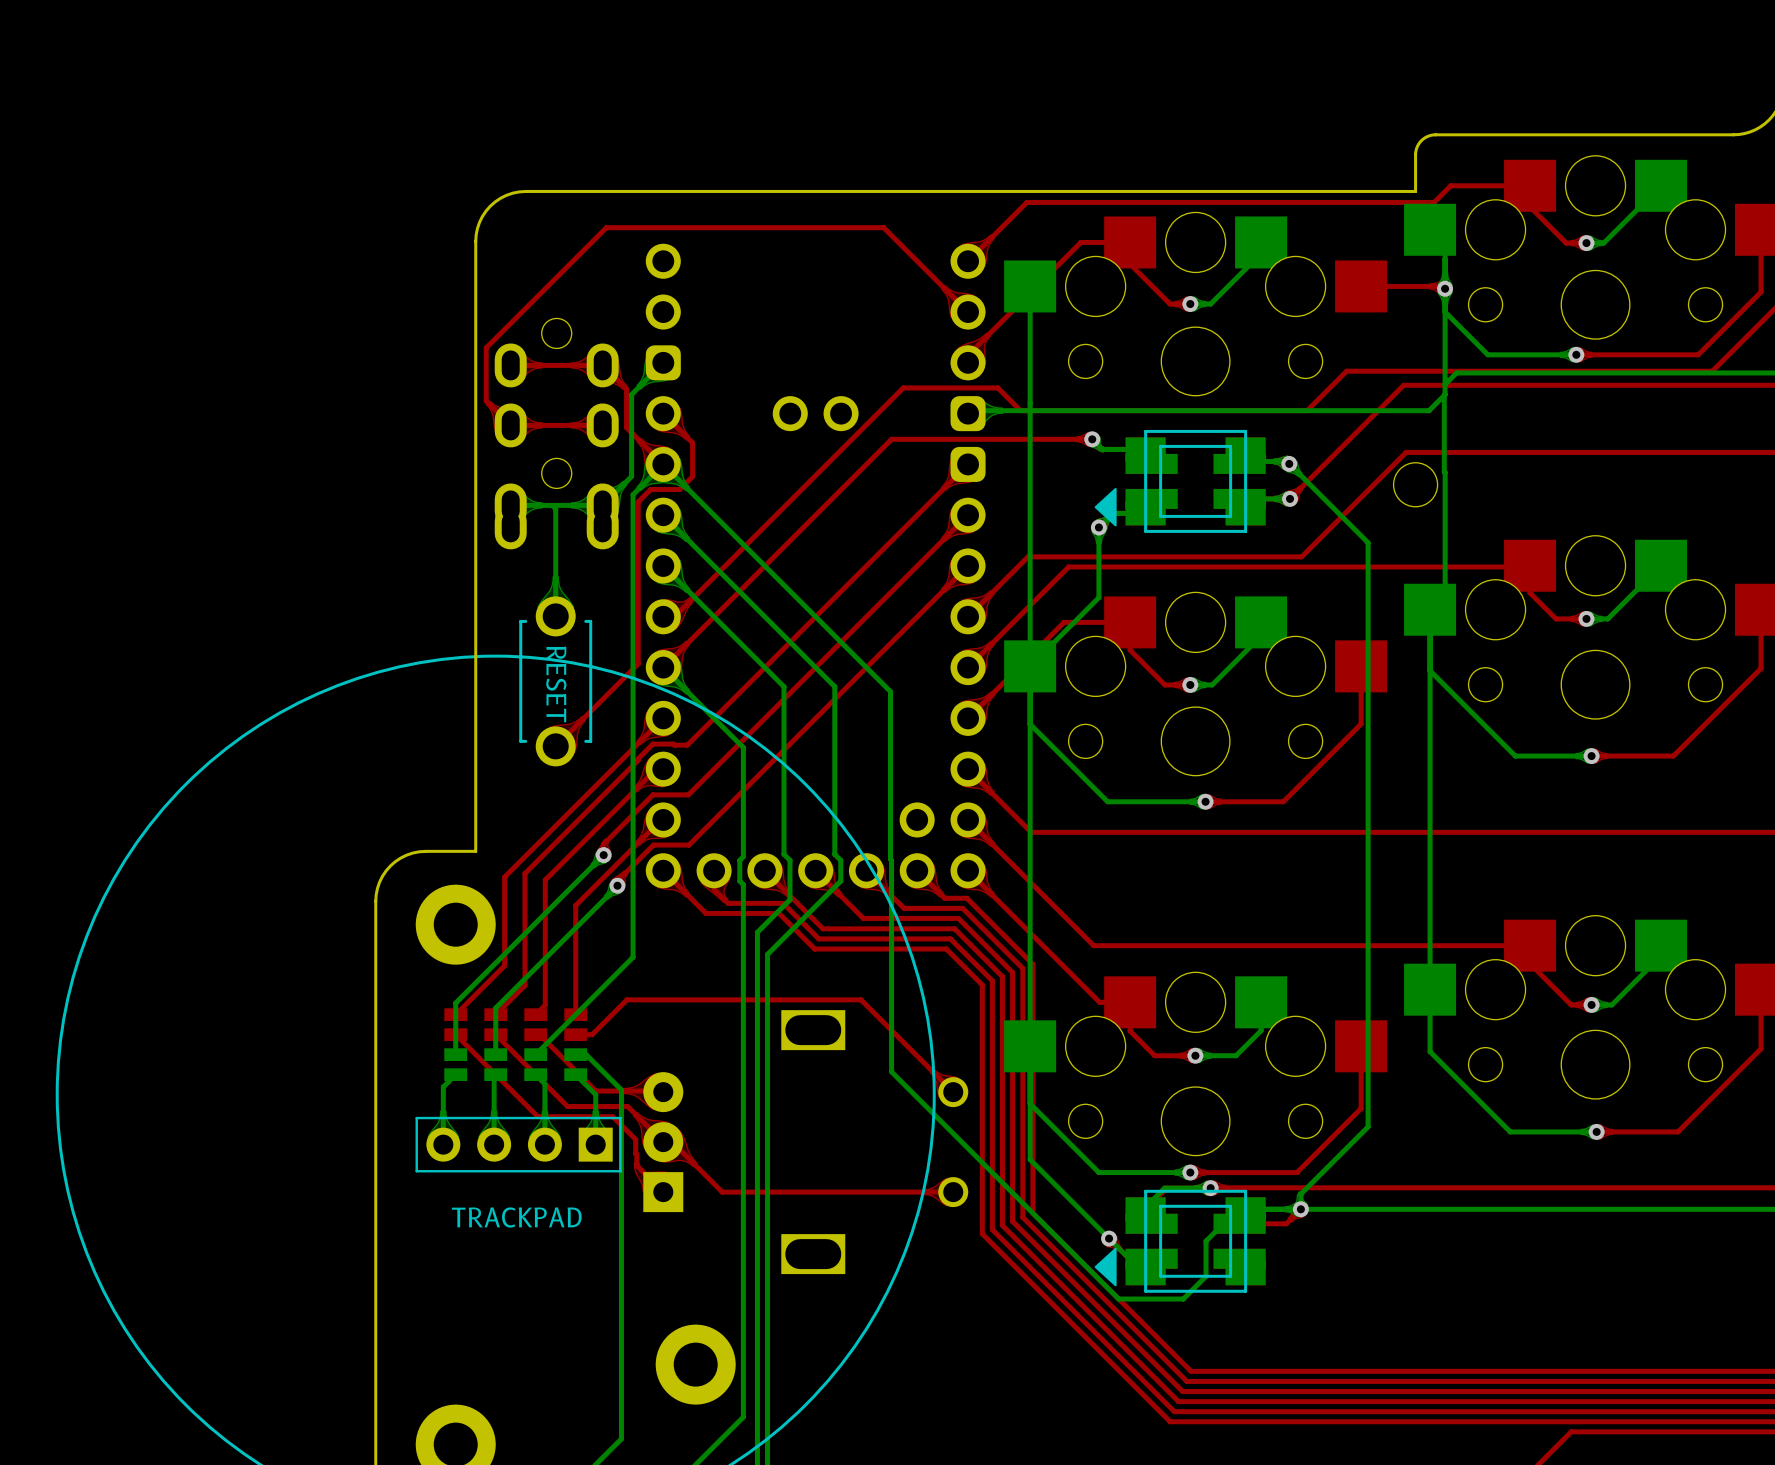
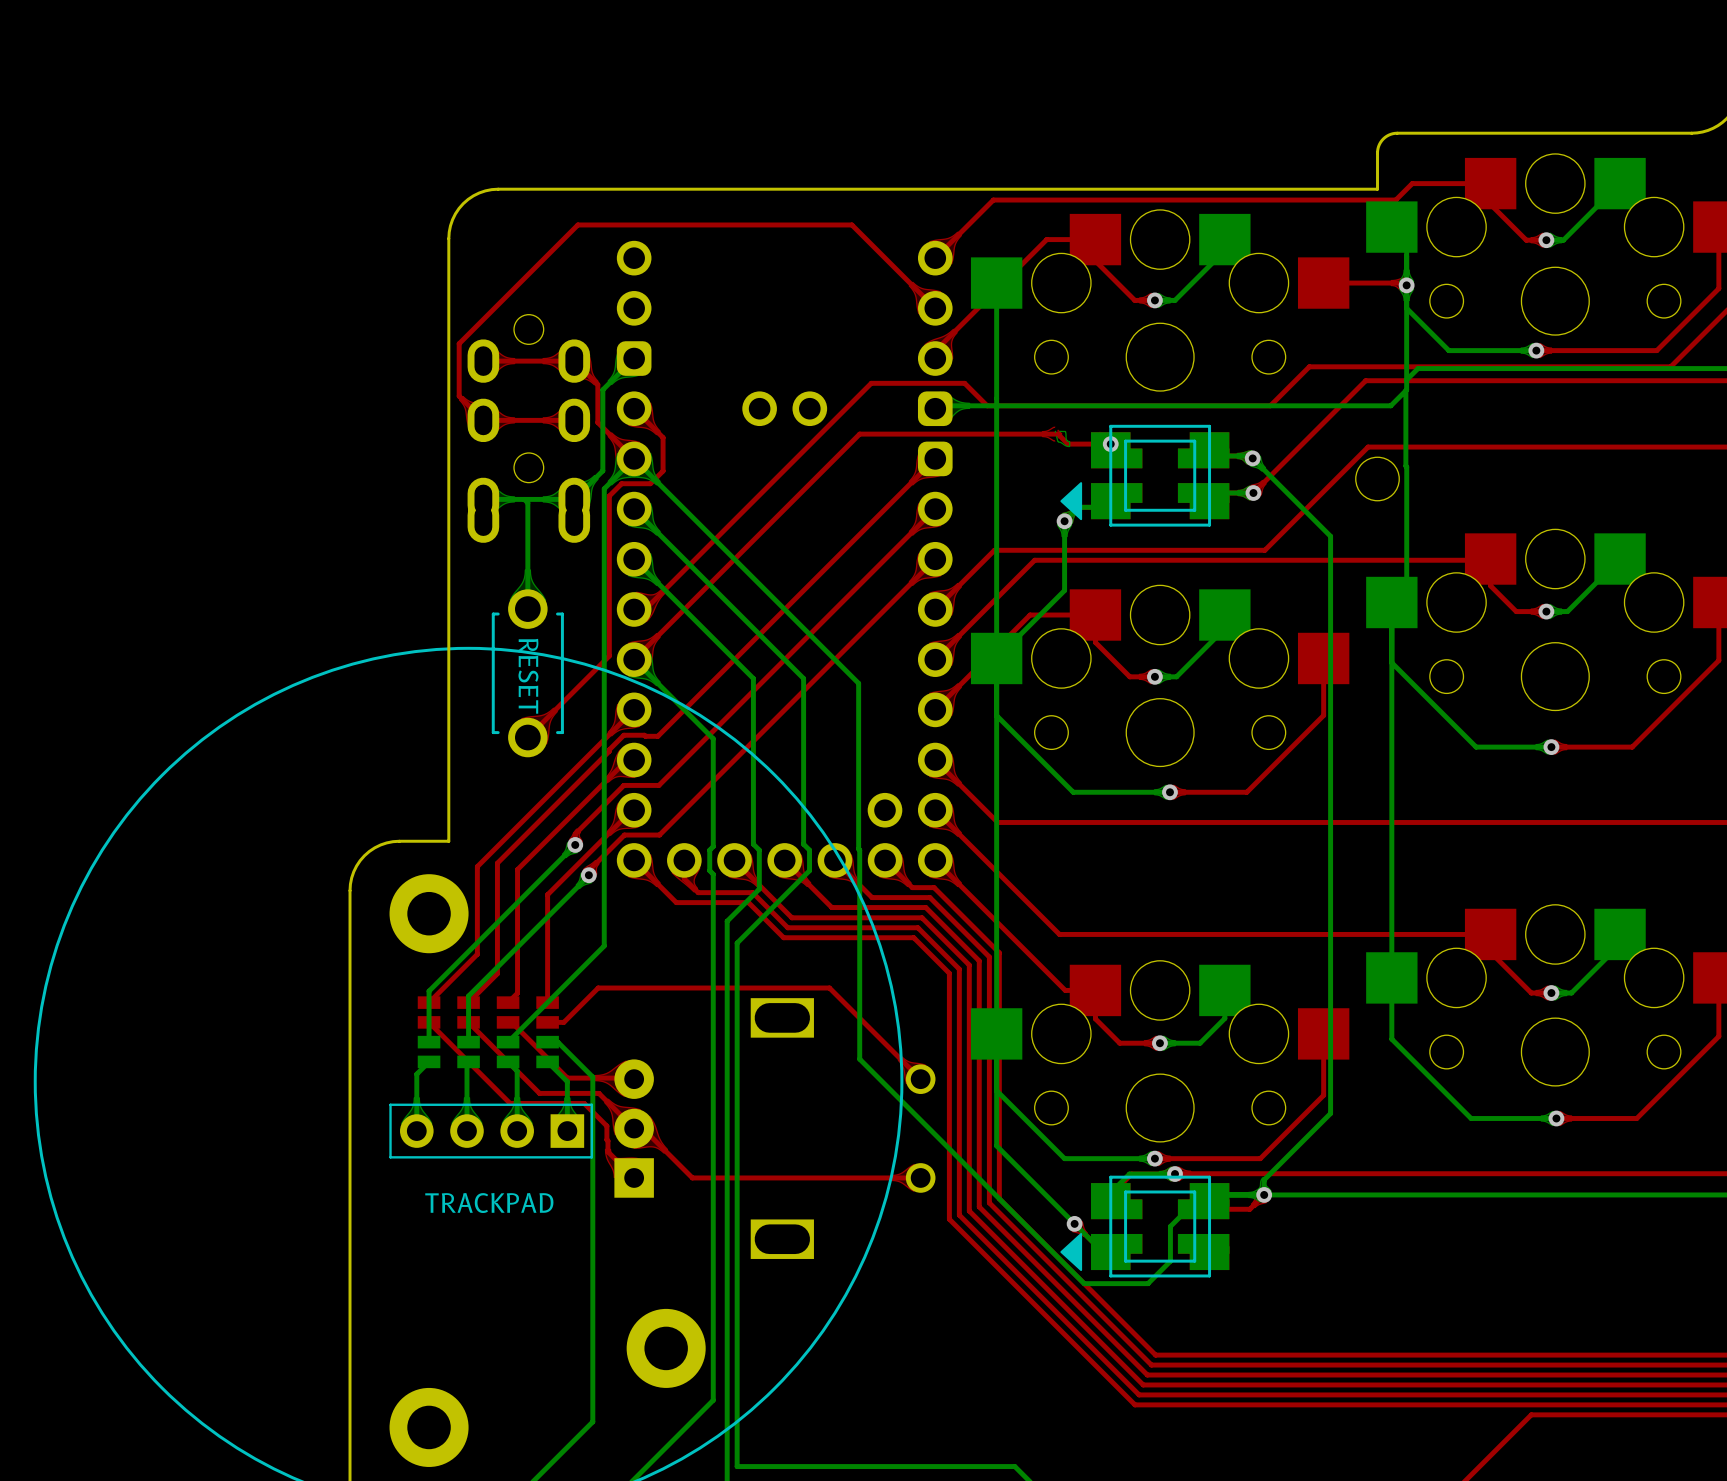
bottom track: (1092, 439) (1102, 449) (1145, 449) -> none
via position: (1092, 439) -> (1110, 444)

